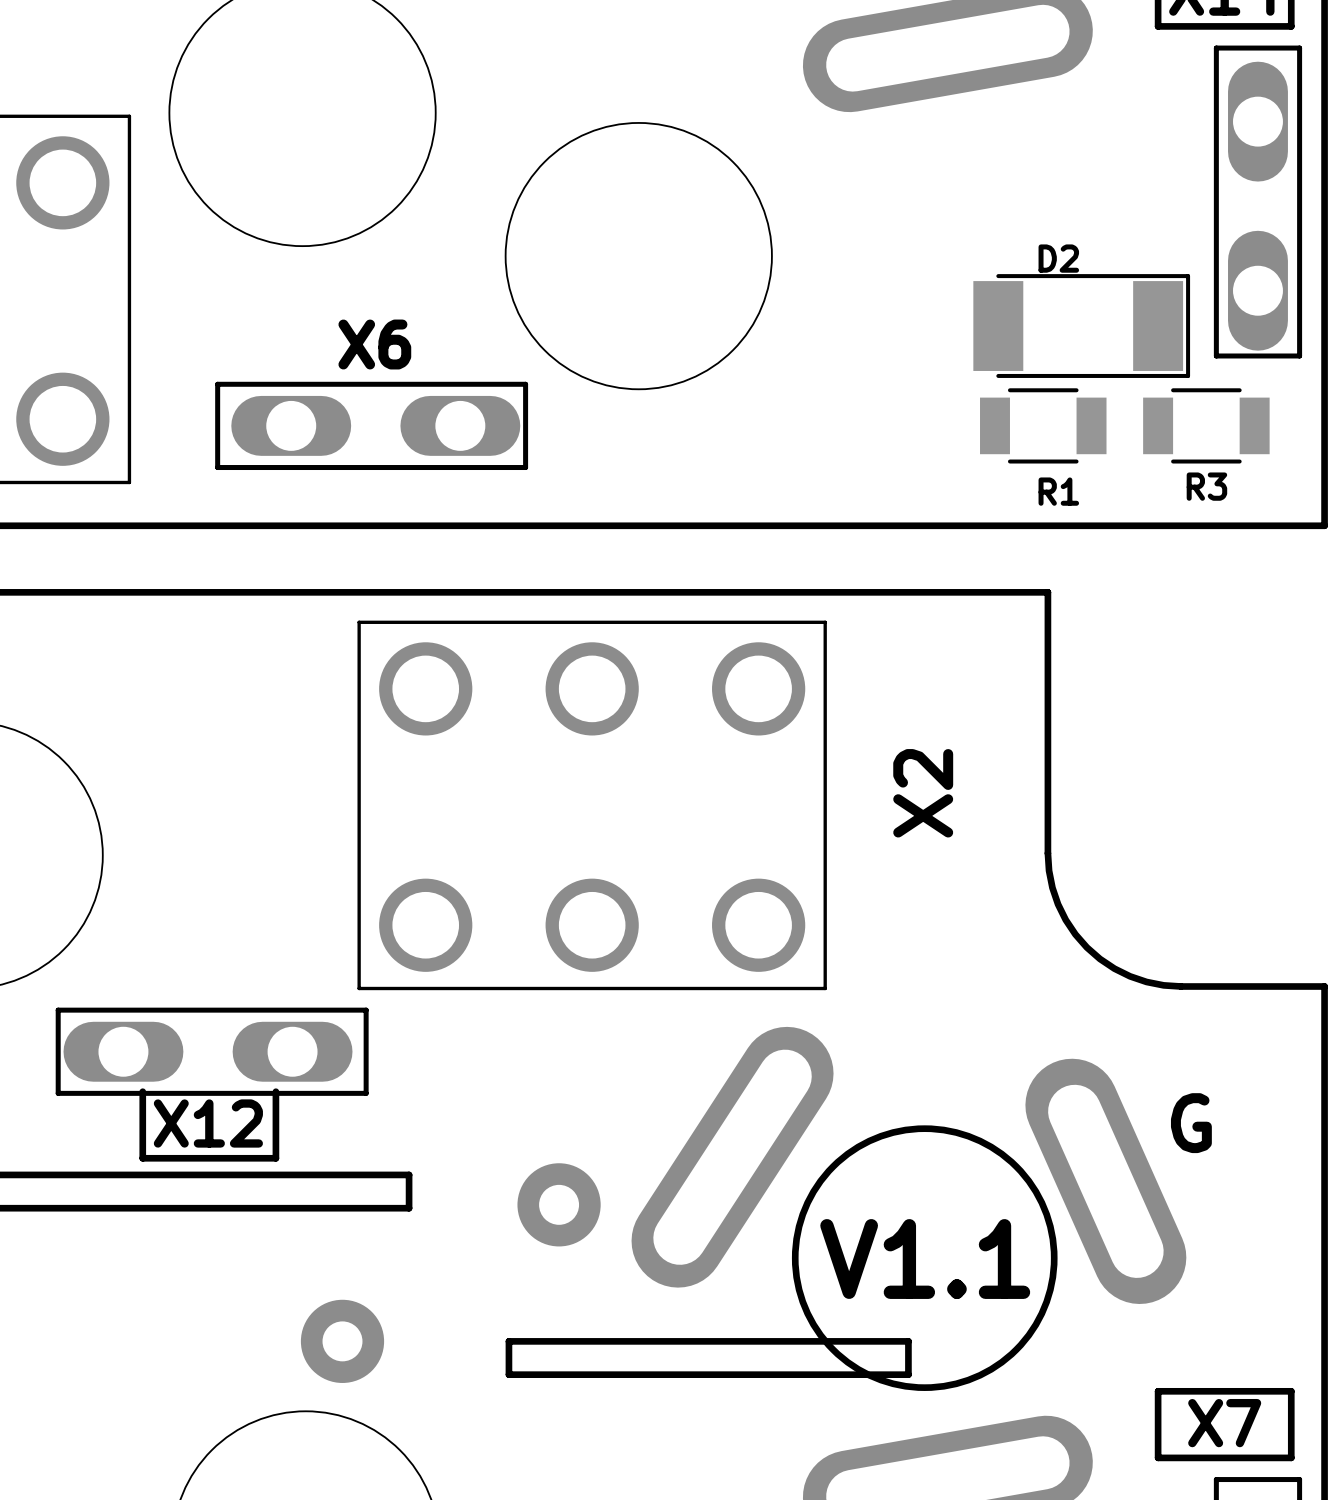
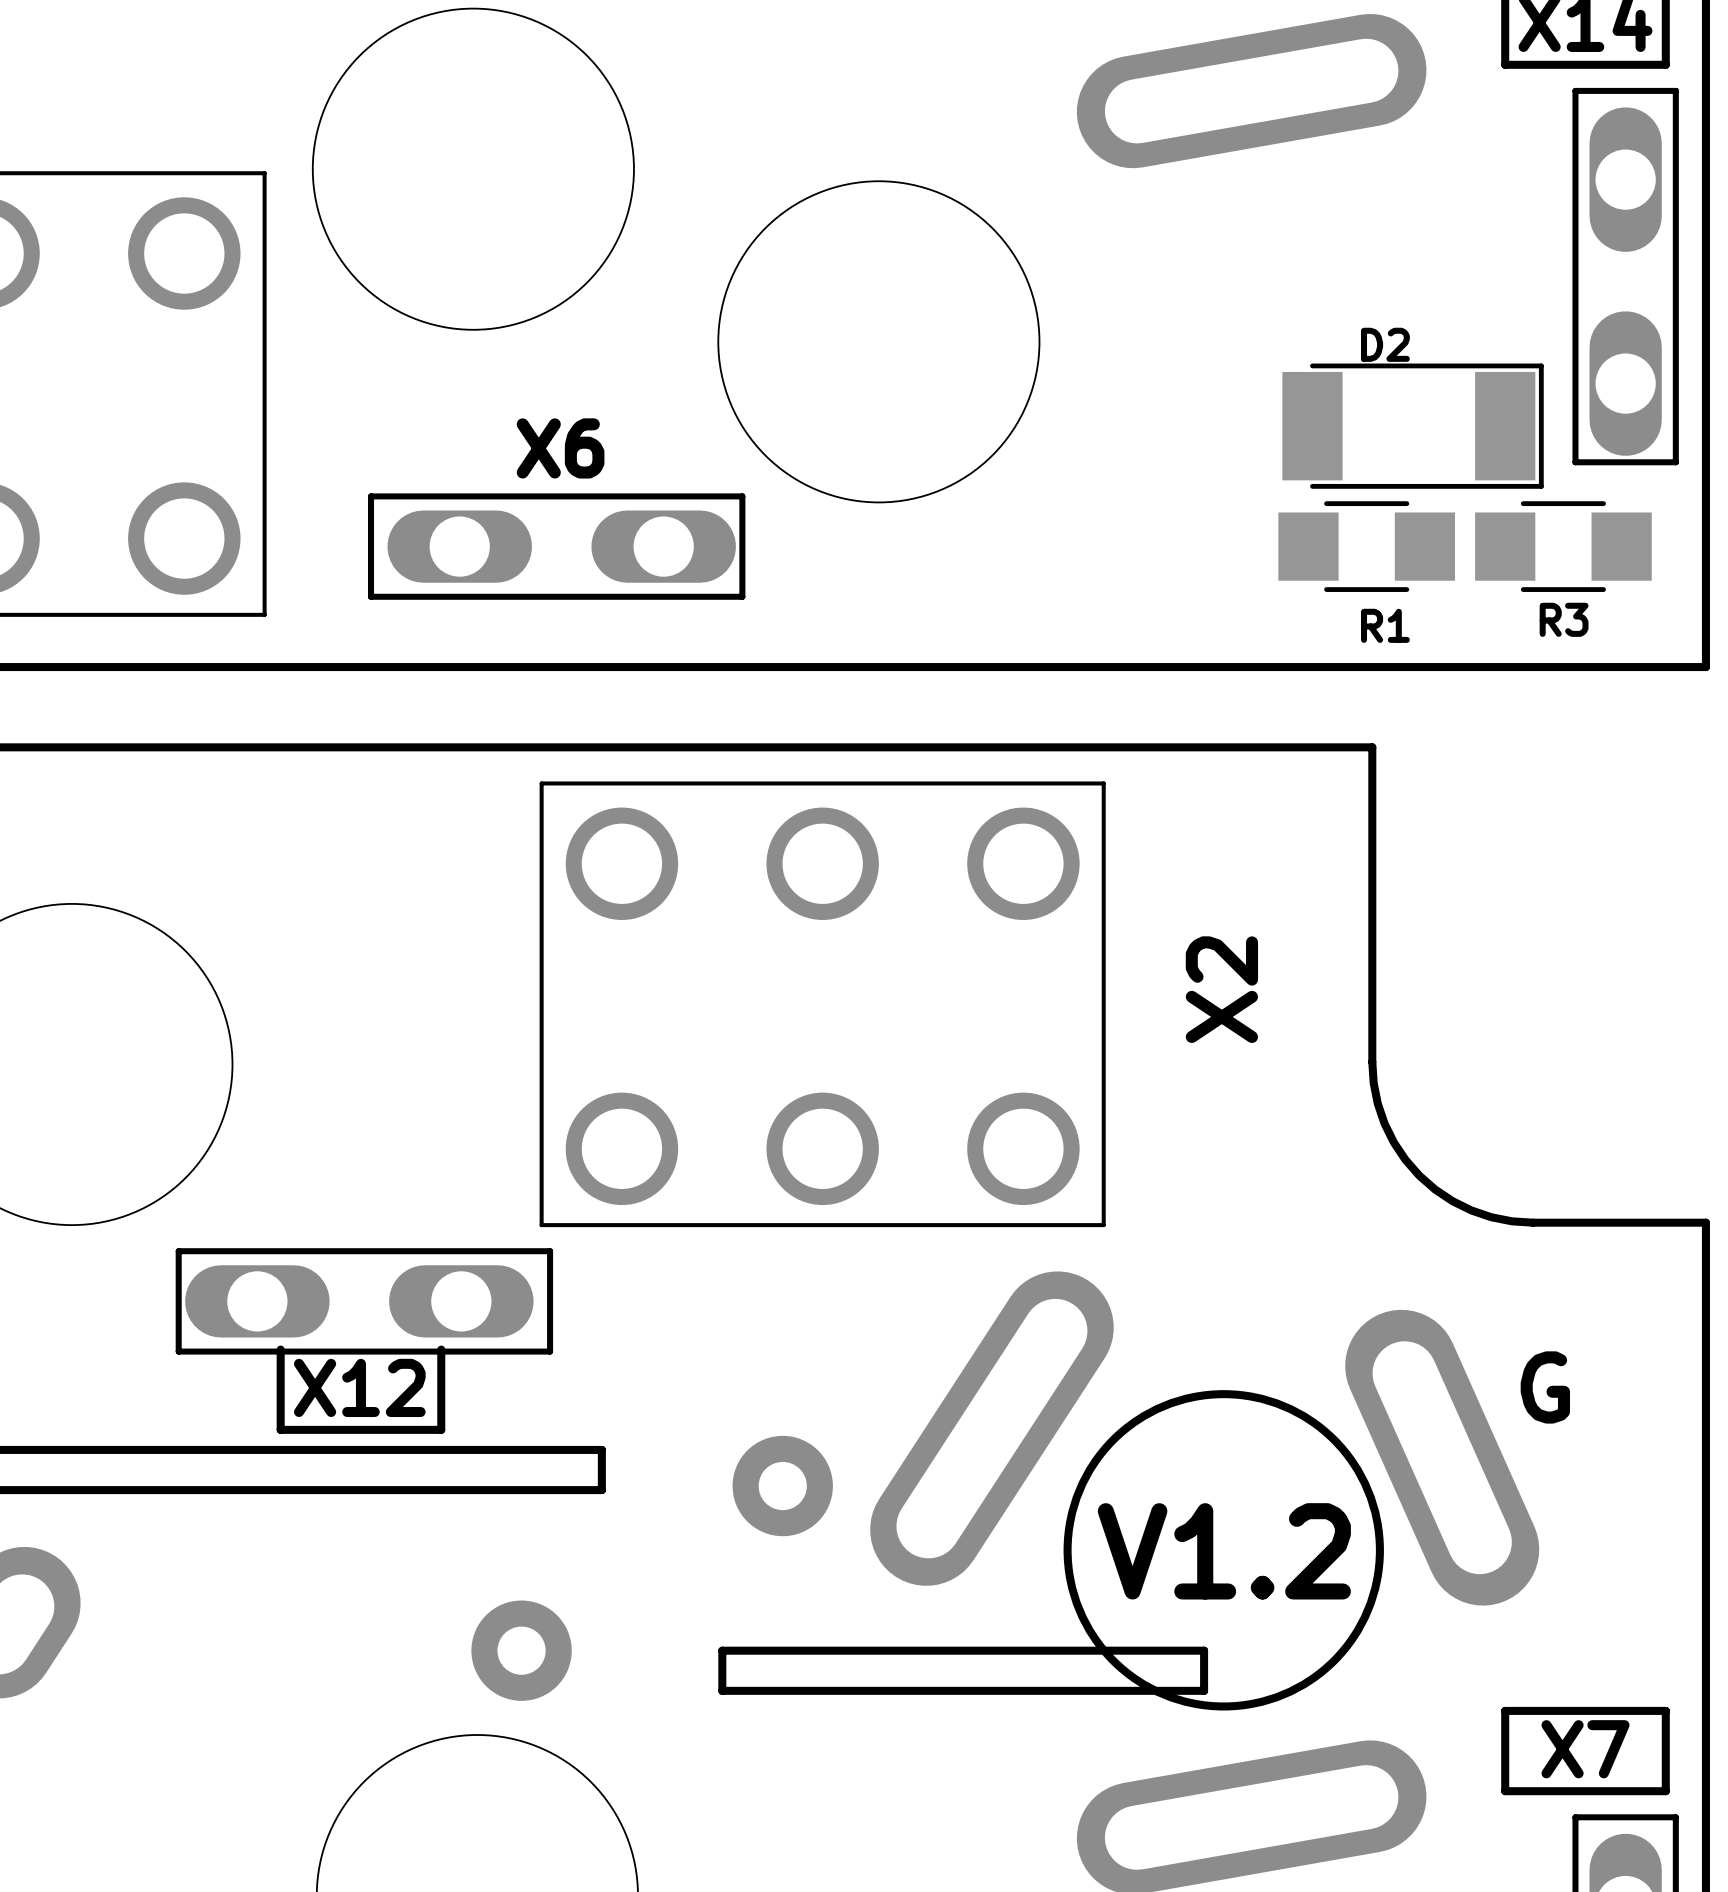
R1 footprint: [980, 388, 1107, 464] -> [1278, 501, 1456, 592]
R3 footprint: [1143, 388, 1270, 464] -> [1475, 501, 1652, 592]
V1.1 name: V1.1 (925, 1258) -> V1.2 (1224, 1551)

